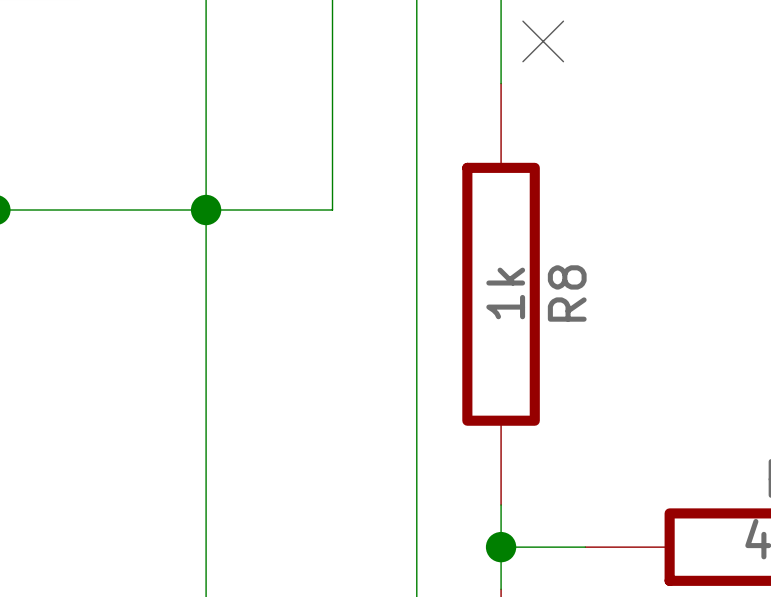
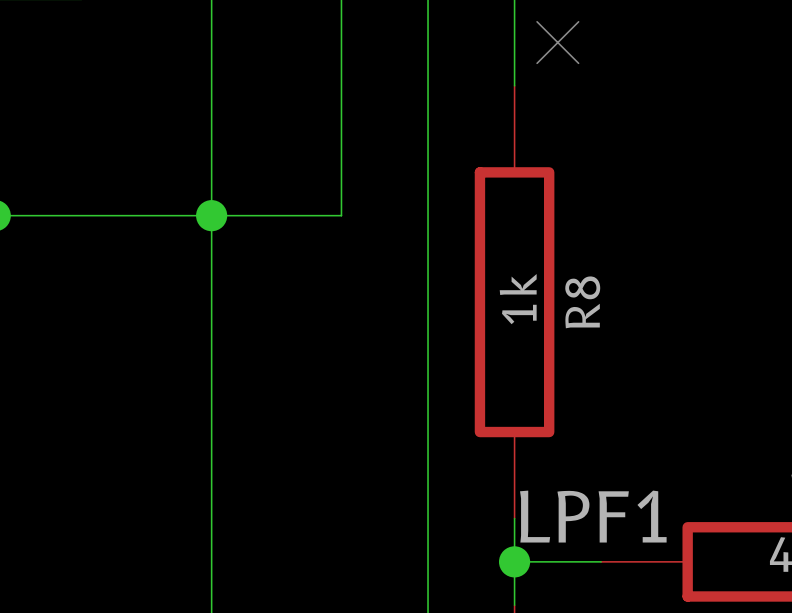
label: none -> LPF1 (593, 516)

